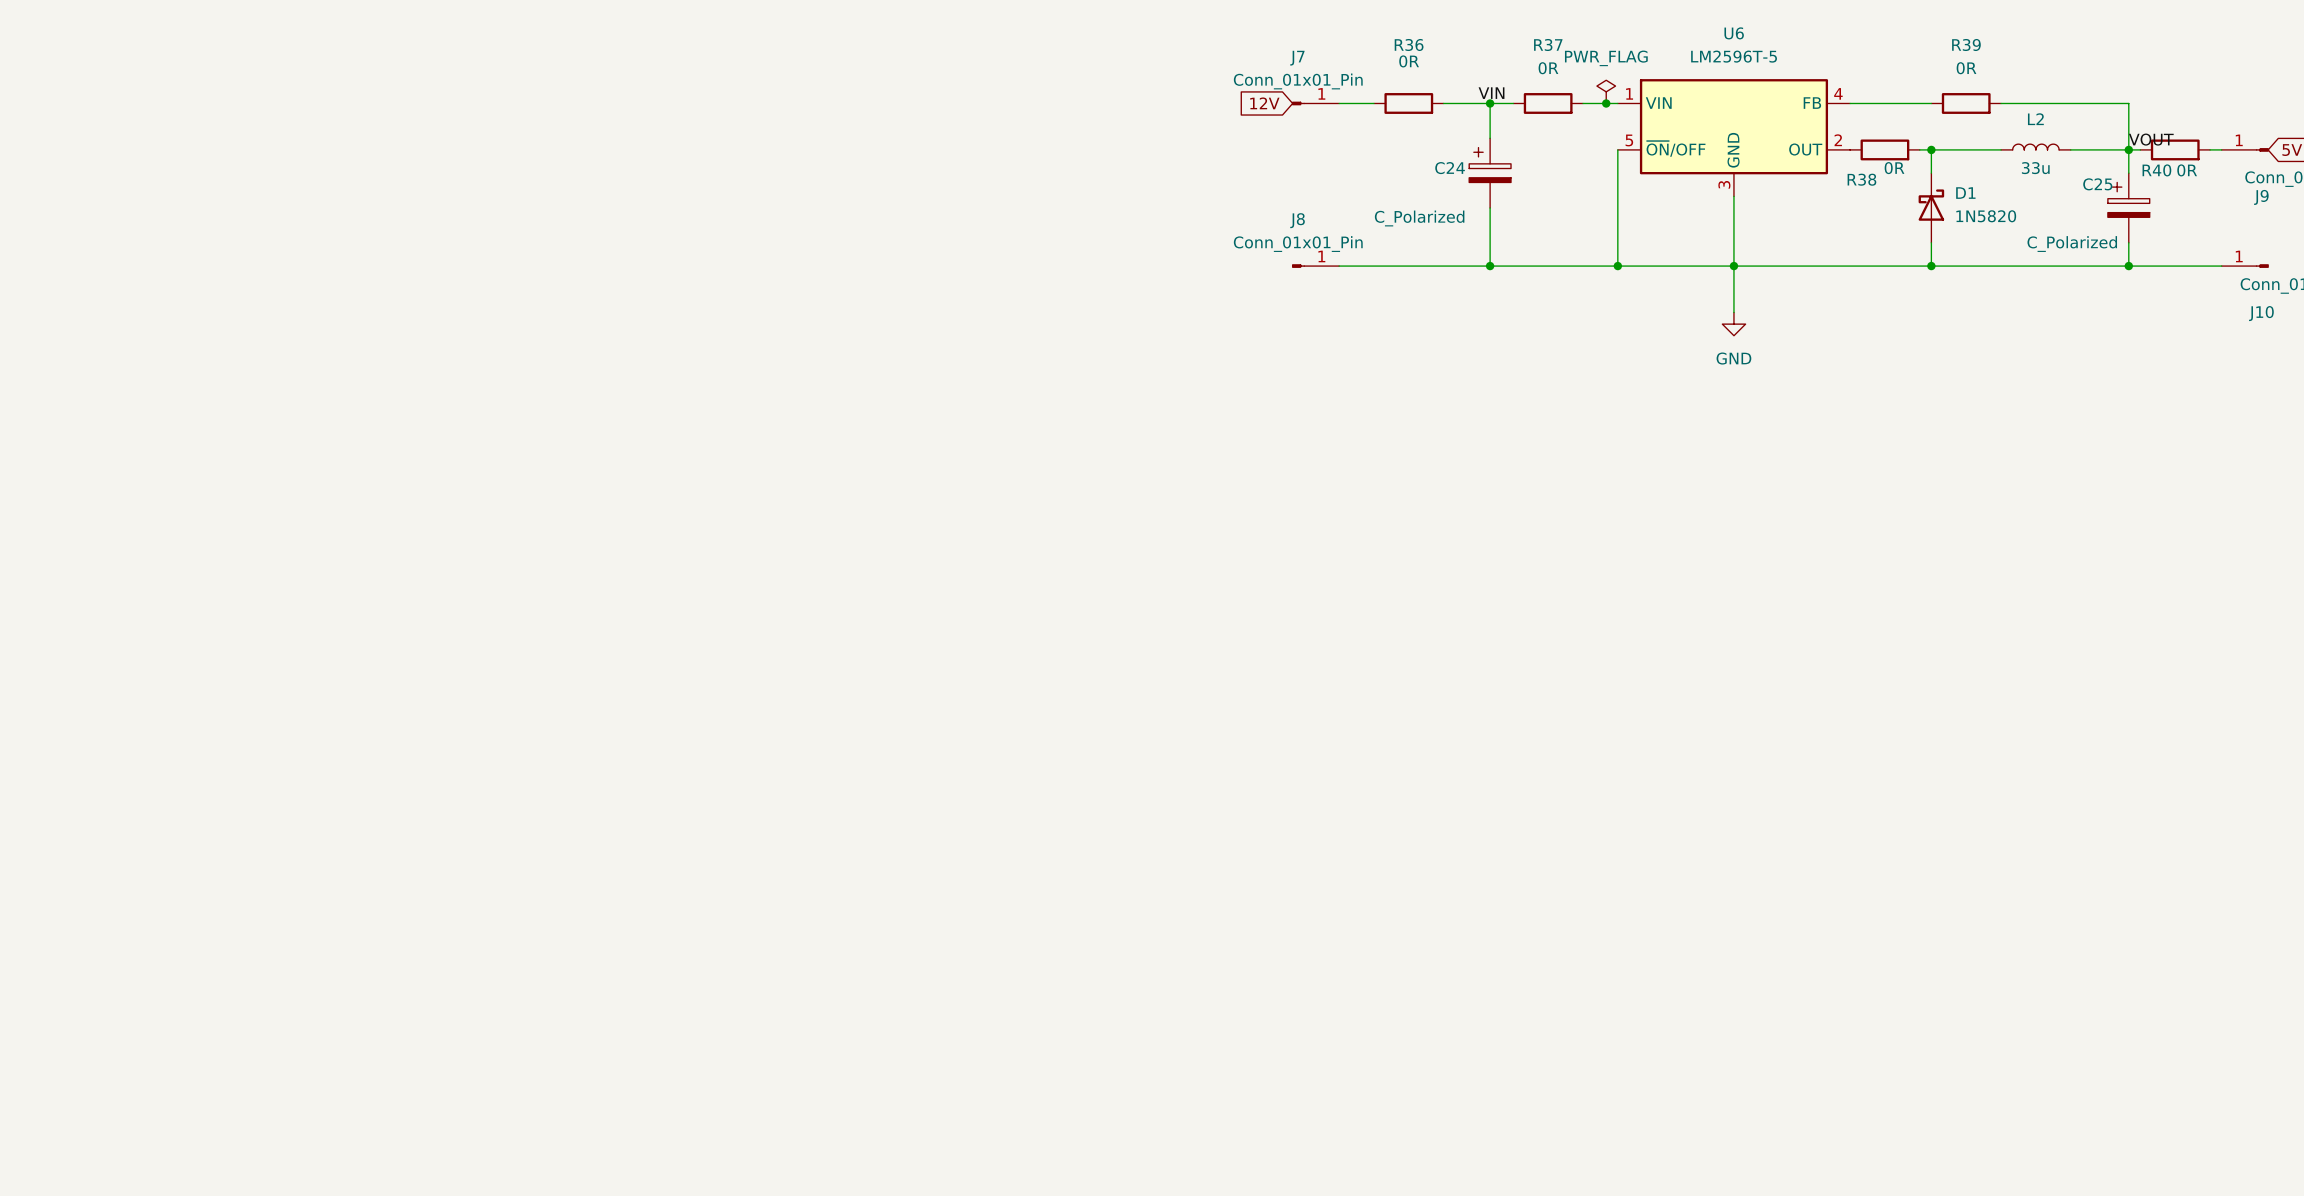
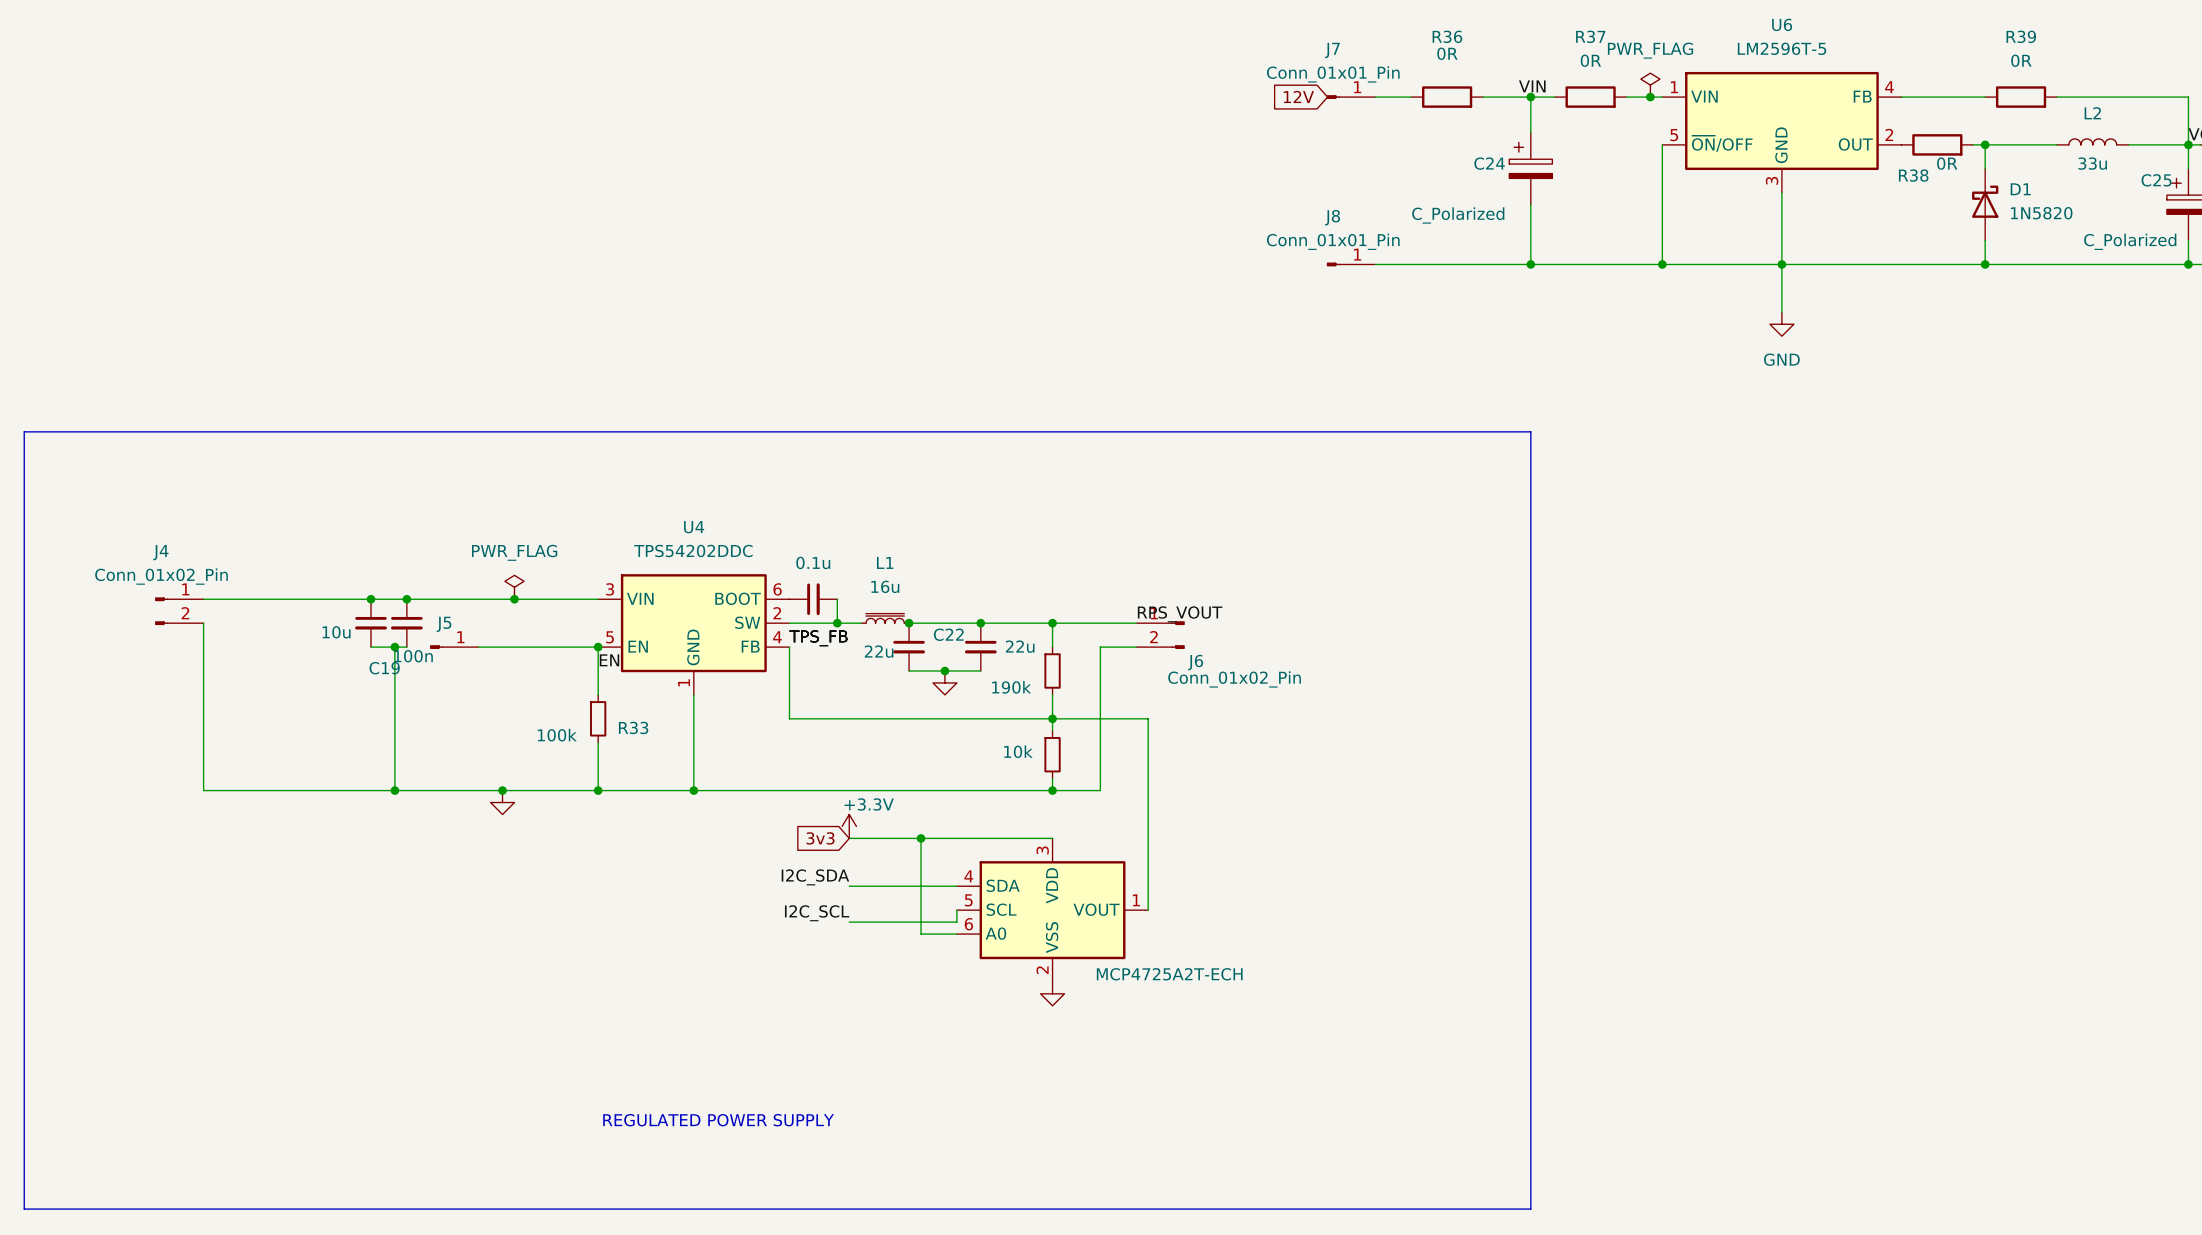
line: none -> (24, 431) (1530, 431) (1530, 1209) (24, 1209) (24, 431)
power symbol: none -> PWR_FLAG (514, 587)
wire: none -> (203, 599) (598, 599)
junction: none -> (371, 599)
junction: none -> (406, 599)
junction: none -> (514, 599)
part: none -> 0.1u (813, 599)
wire: none -> (837, 599) (837, 623)
J4: none -> Conn_01x02_Pin (179, 611)
label: none -> RPS_VOUT (1180, 614)
L1: none -> 16u (885, 618)
wire: none -> (203, 623) (203, 790) (1100, 790) (1100, 647) (1136, 647)
C19: none -> 10u (371, 623)
part: none -> 100n (406, 623)
wire: none -> (789, 623) (861, 623)
junction: none -> (837, 623)
wire: none -> (909, 623) (1136, 623)
junction: none -> (909, 623)
junction: none -> (980, 623)
wire: none -> (1052, 623) (1052, 647)
junction: none -> (1052, 623)
U4: none -> TPS54202DDC (693, 634)
J6: none -> Conn_01x02_Pin (1160, 635)
label: none -> TPS_FB (818, 638)
wire: none -> (371, 647) (406, 647)
wire: none -> (394, 647) (394, 790)
junction: none -> (394, 647)
J5: none -> (454, 647)
wire: none -> (478, 647) (598, 647) (598, 694)
junction: none -> (598, 647)
wire: none -> (789, 647) (789, 718) (1148, 718) (1148, 910)
C22: none -> 22u (909, 647)
part: none -> 22u (980, 647)
label: none -> EN (609, 660)
wire: none -> (909, 671) (980, 671)
junction: none -> (944, 671)
part: none -> 190k (1052, 671)
power symbol: none -> (944, 682)
wire: none -> (693, 694) (693, 790)
wire: none -> (1052, 694) (1052, 730)
R33: none -> 100k (598, 718)
junction: none -> (1052, 718)
wire: none -> (598, 742) (598, 790)
part: none -> 10k (1052, 754)
wire: none -> (1052, 778) (1052, 790)
junction: none -> (394, 790)
junction: none -> (502, 790)
junction: none -> (598, 790)
junction: none -> (693, 790)
junction: none -> (1052, 790)
power symbol: none -> (502, 802)
power symbol: none -> +3.3V (849, 826)
global label: none -> 3v3 (820, 838)
wire: none -> (849, 838) (1052, 838)
wire: none -> (921, 838) (921, 934) (956, 934)
junction: none -> (921, 838)
label: none -> I2C_SDA (815, 877)
wire: none -> (849, 886) (956, 886)
wire: none -> (956, 910) (956, 922) (849, 922)
part: none -> MCP4725A2T-ECH (1052, 910)
label: none -> I2C_SCL (817, 913)
power symbol: none -> (1052, 993)
text: none -> REGULATED POWER SUPPLY (718, 1120)

